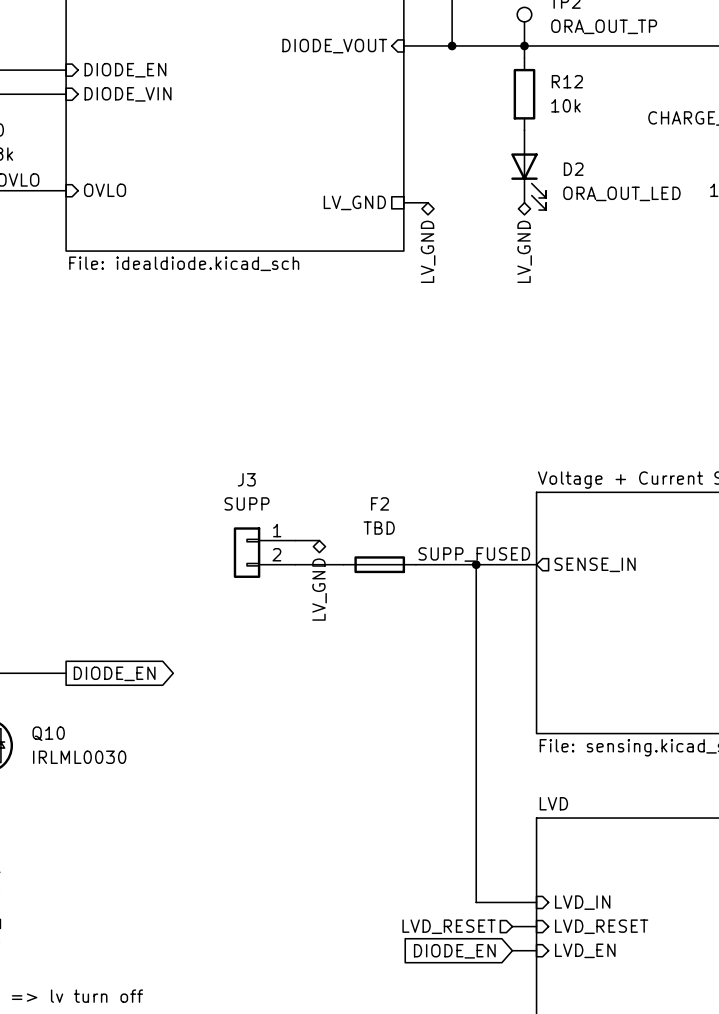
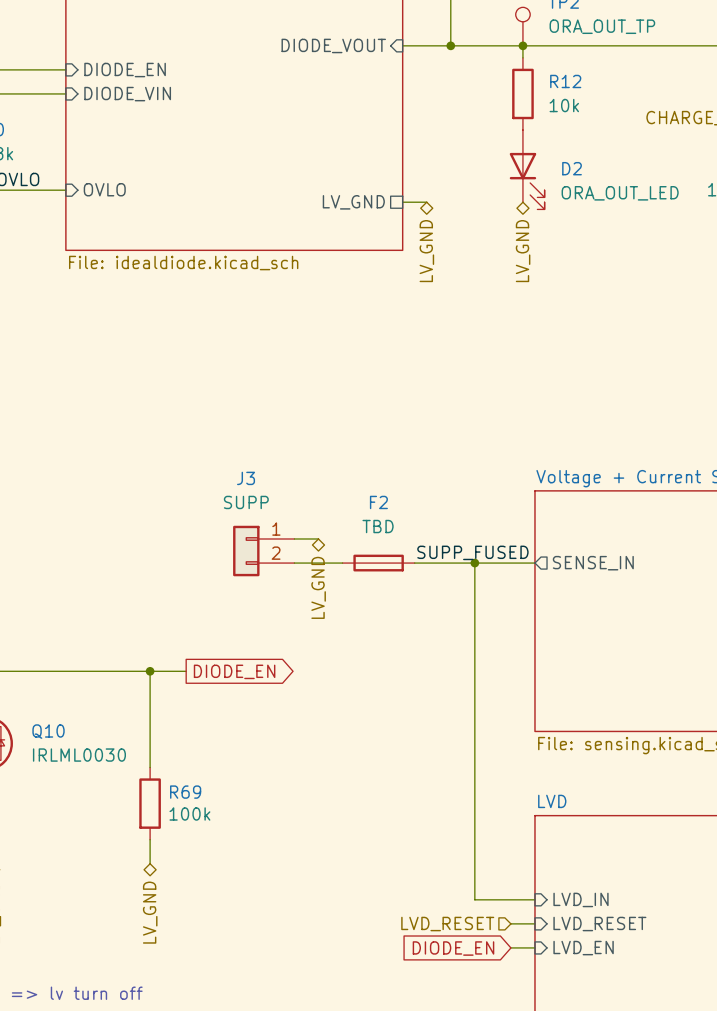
wire: none -> (65, 671) (186, 671)
global label position: DIODE_EN (114, 673) -> DIODE_EN (234, 671)
wire: none -> (150, 671) (150, 767)
junction: none -> (150, 671)
R69: none -> 100k (150, 803)
wire: none -> (150, 839) (150, 863)
hierarchical label: none -> LV_GND (150, 912)

